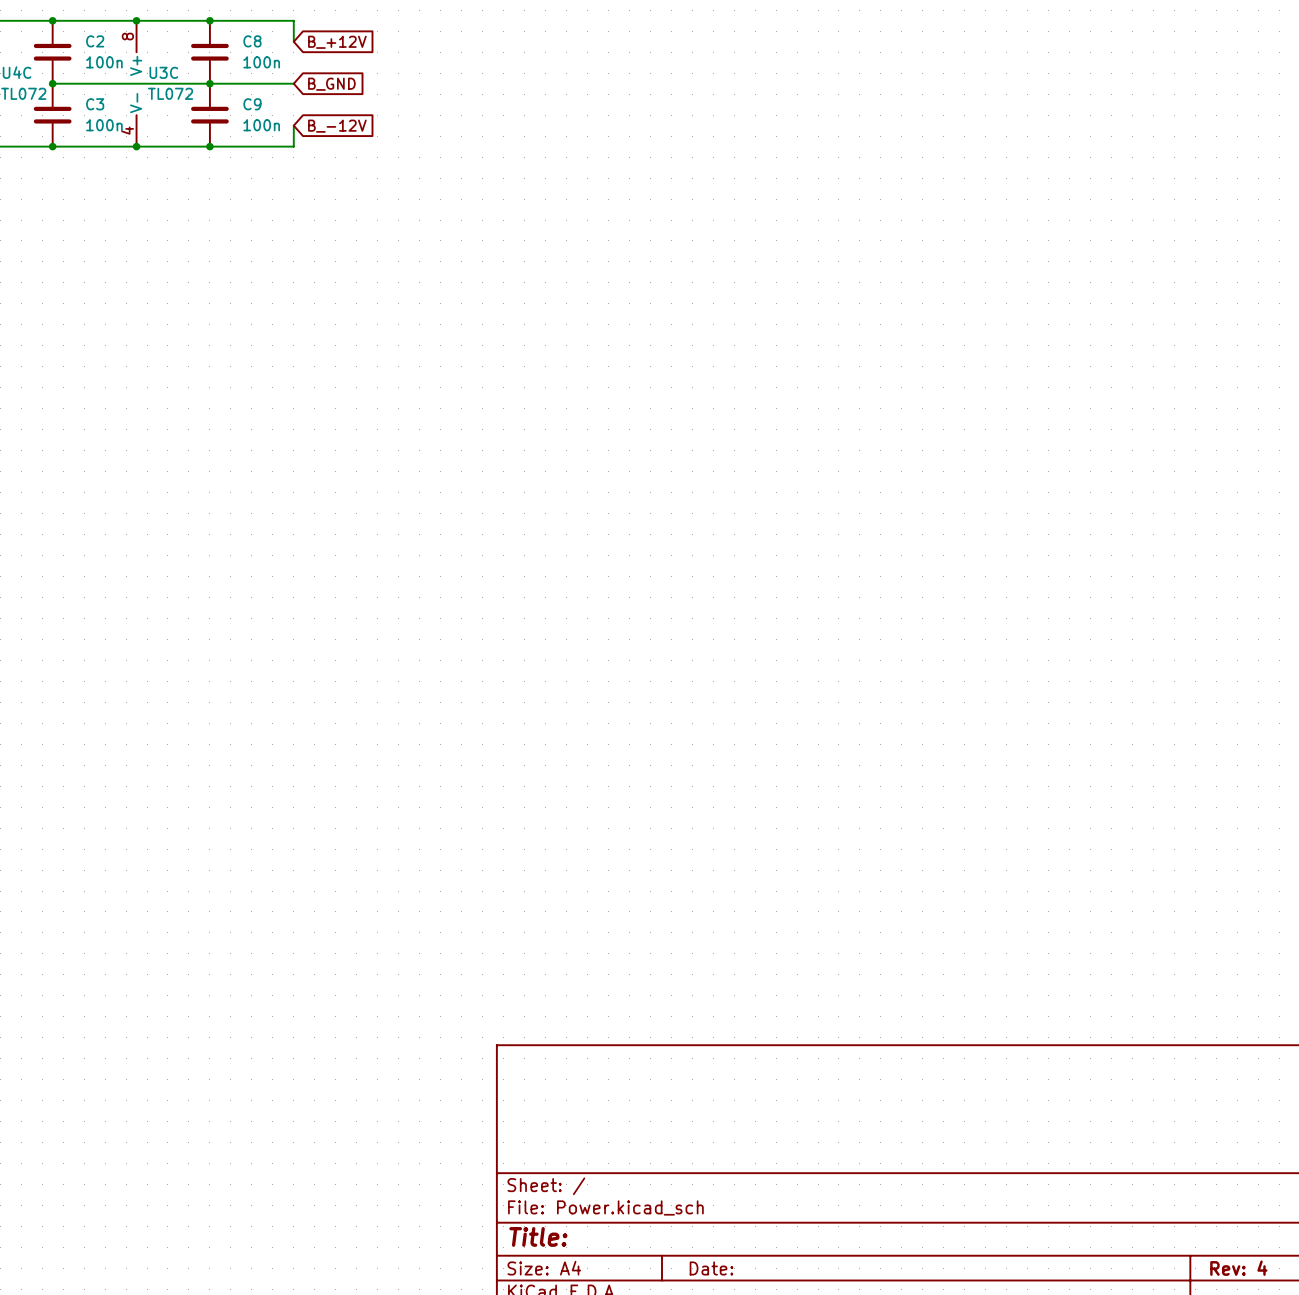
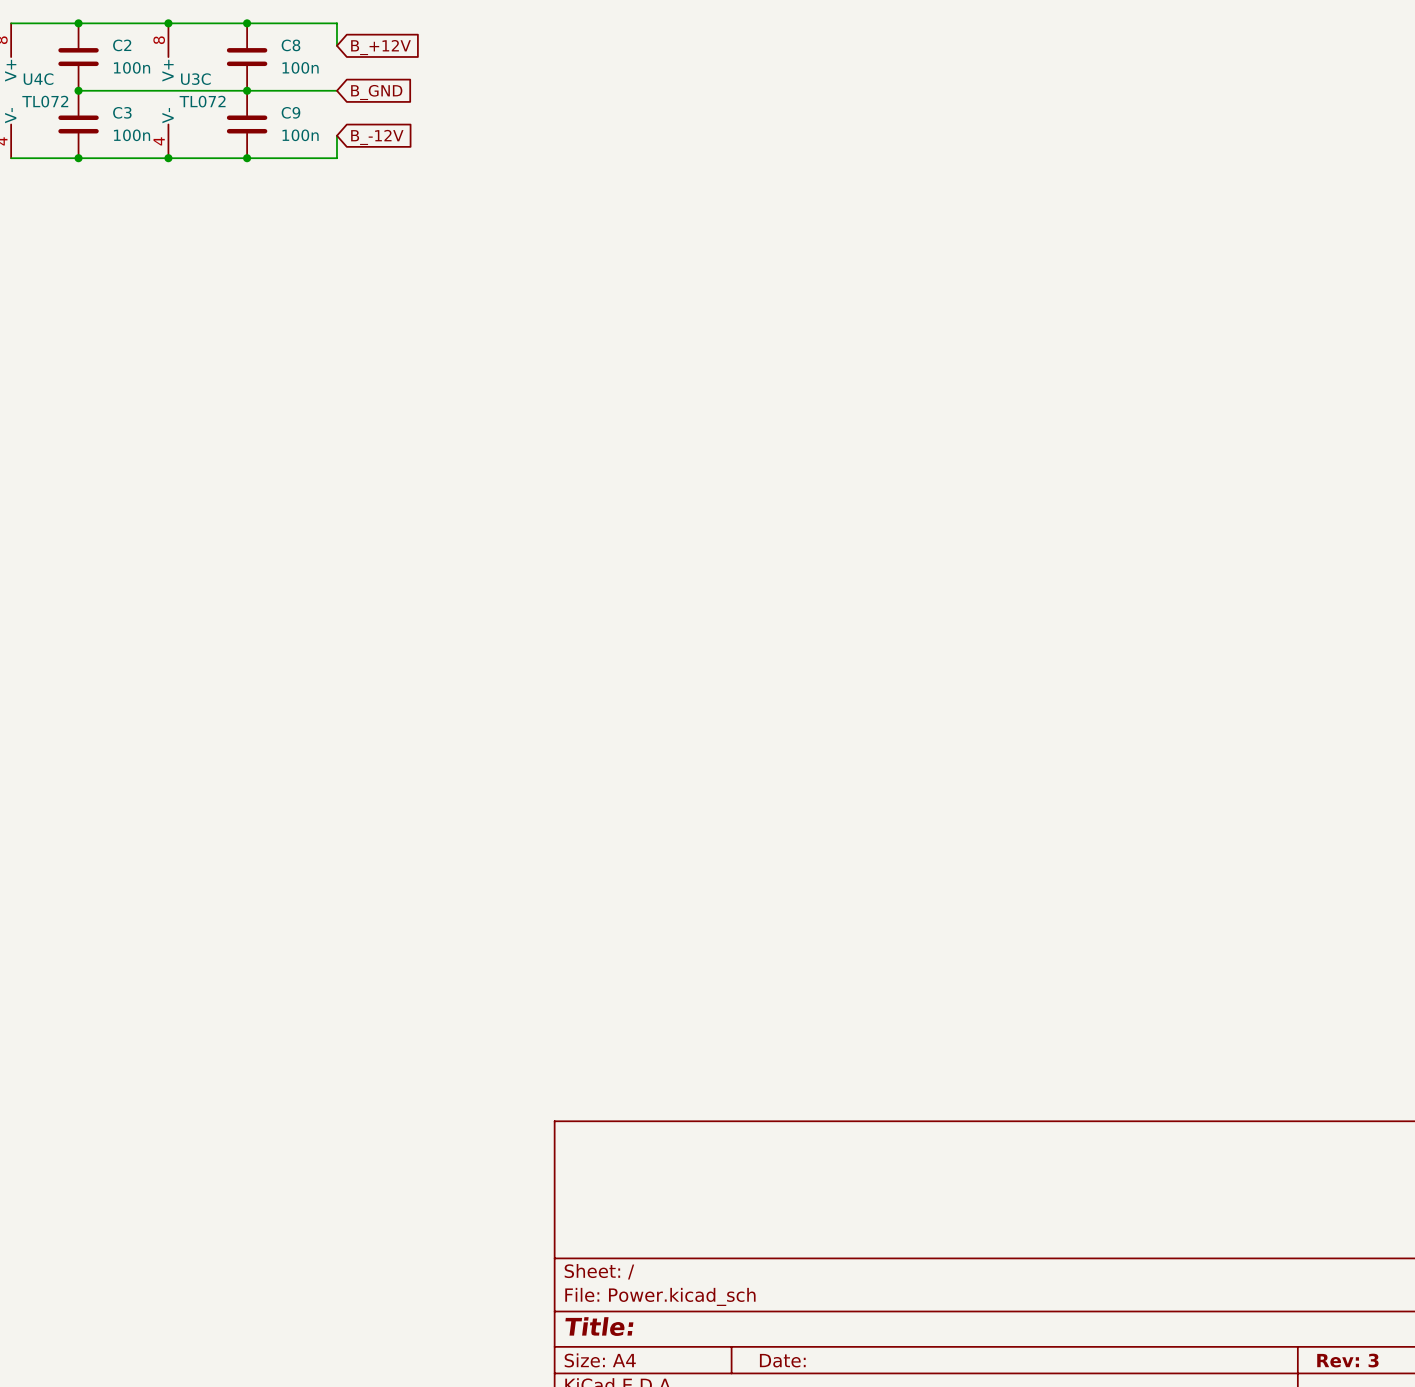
title block: Rev: 4 (1238, 1268) -> Rev: 3 (1347, 1360)

